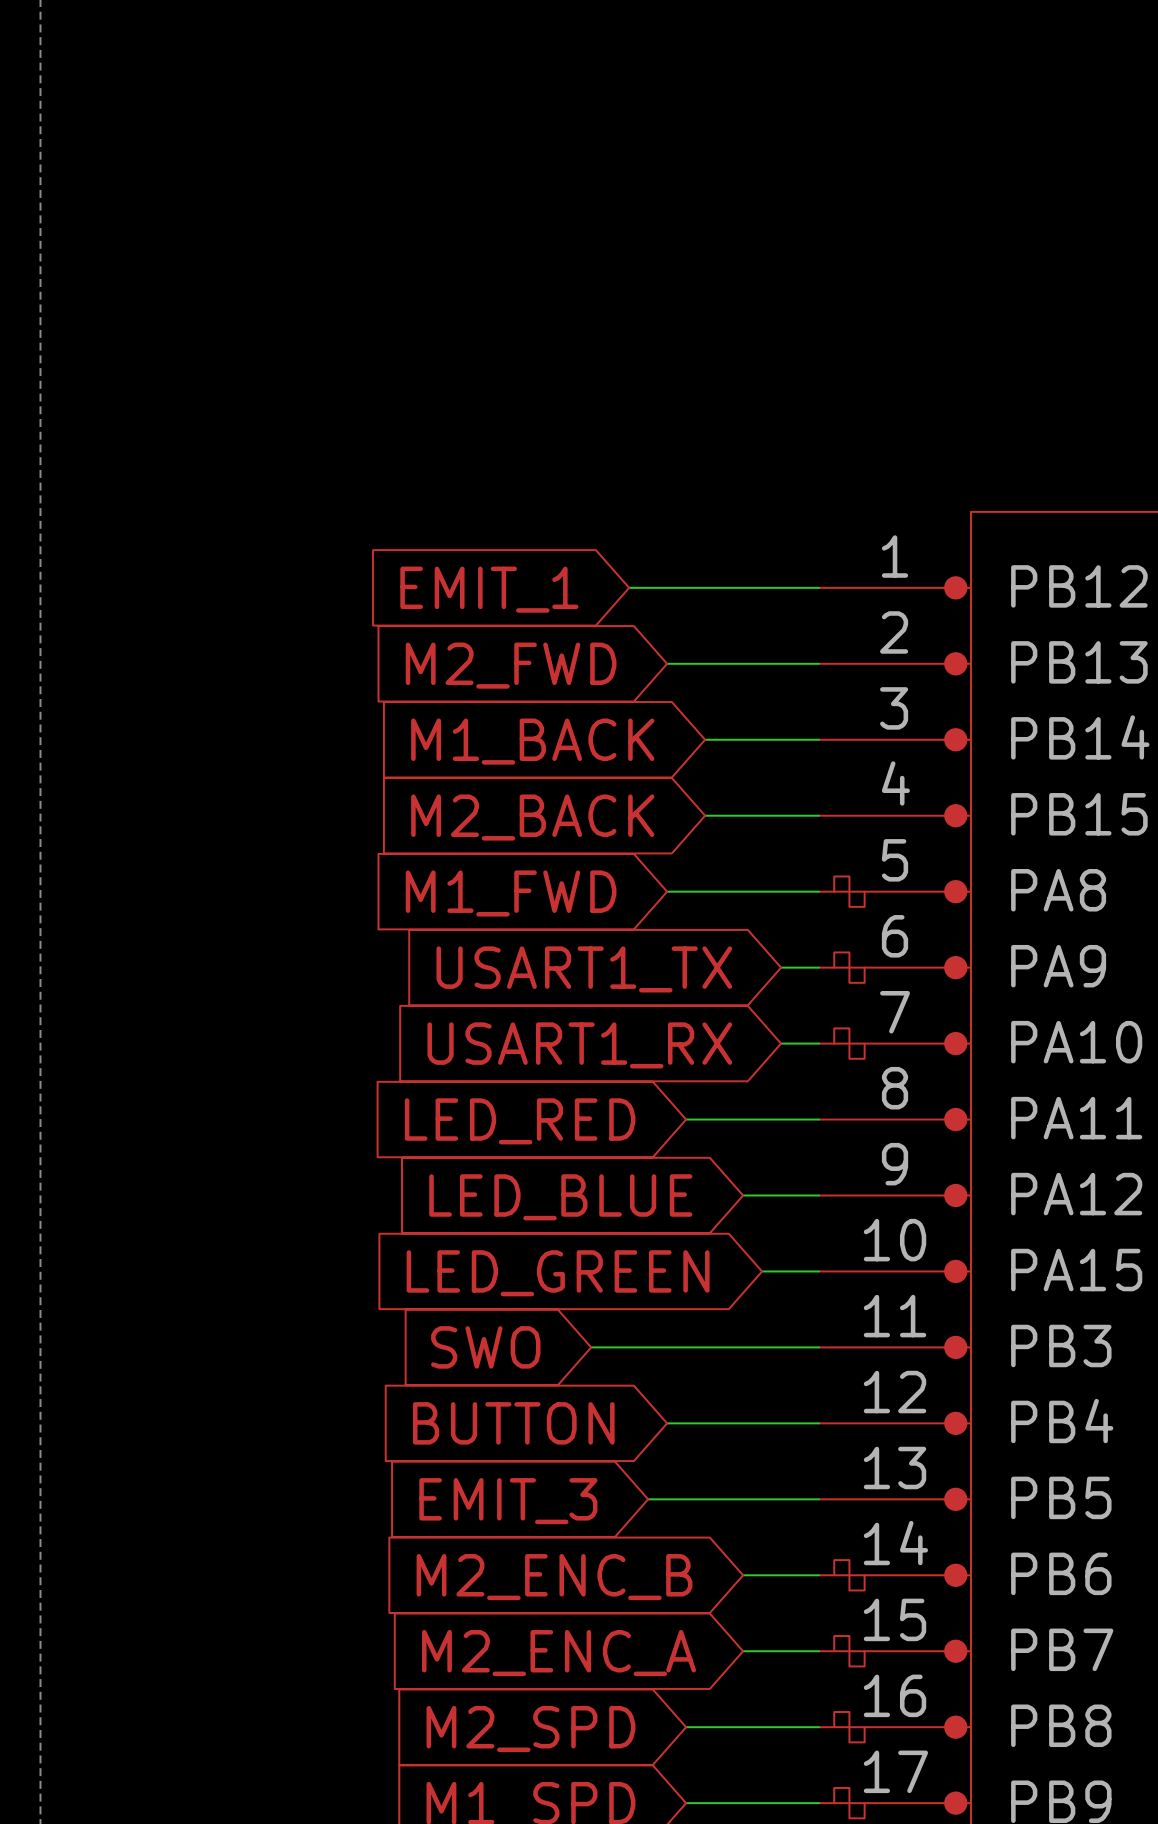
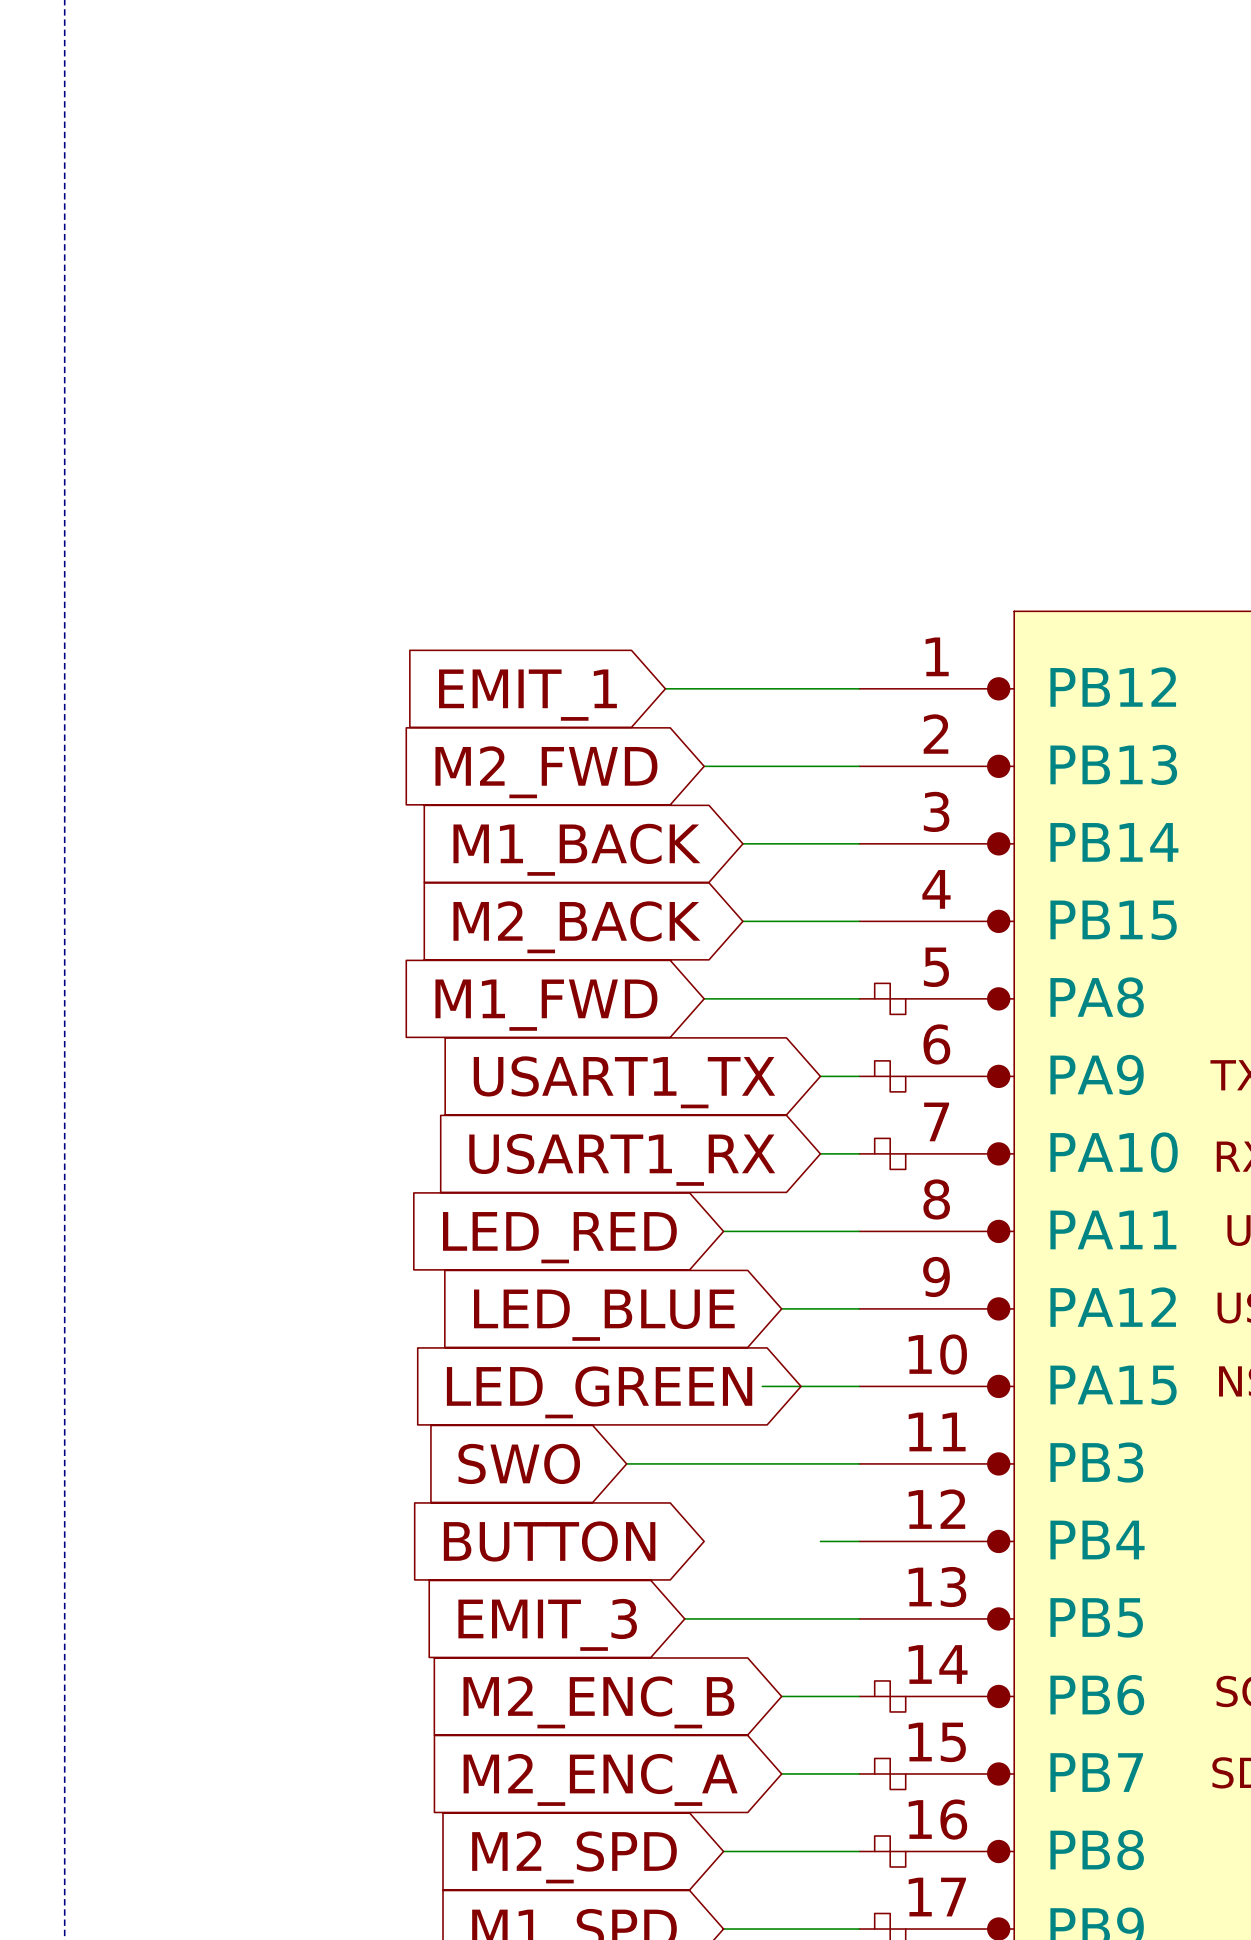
wire: none -> (762, 1386) (801, 1386)
wire: (667, 1423) (781, 1423) -> none

